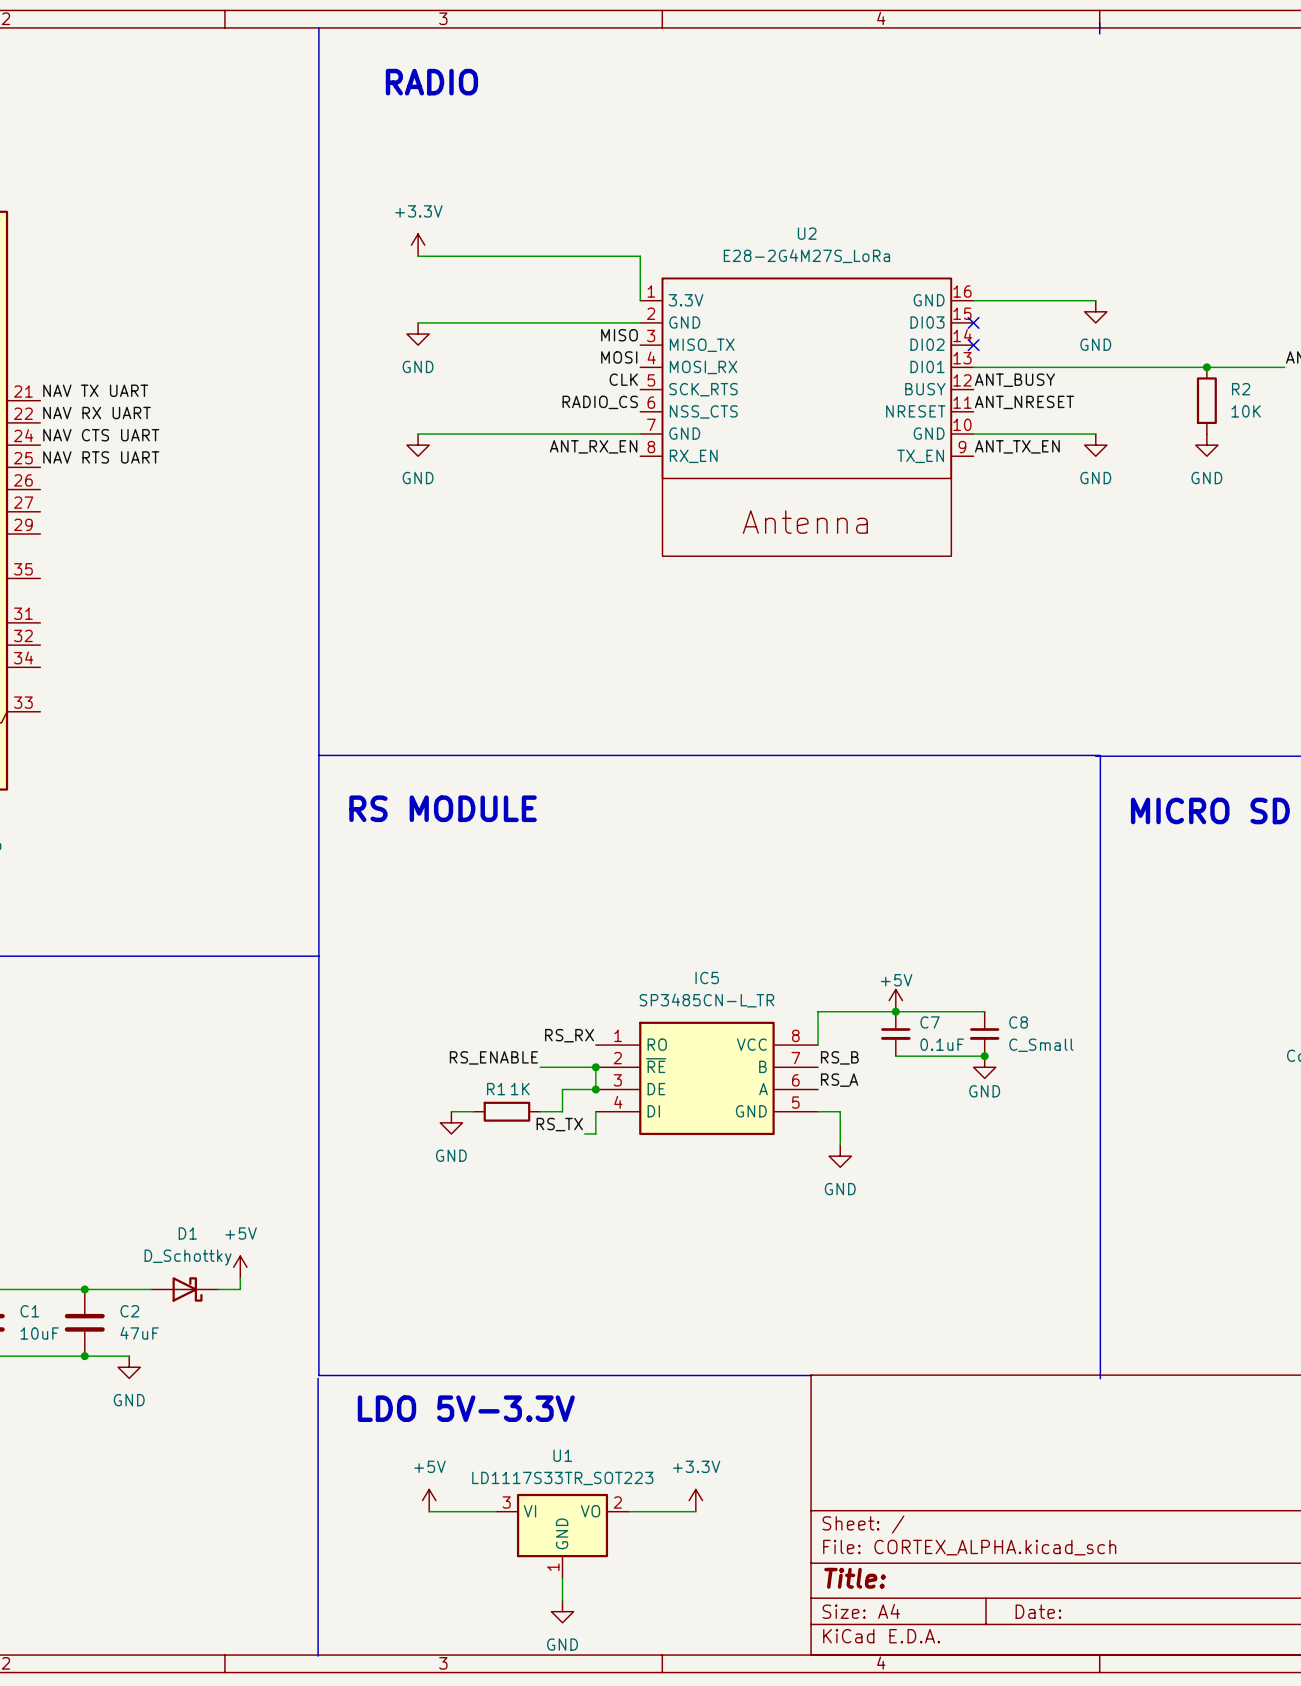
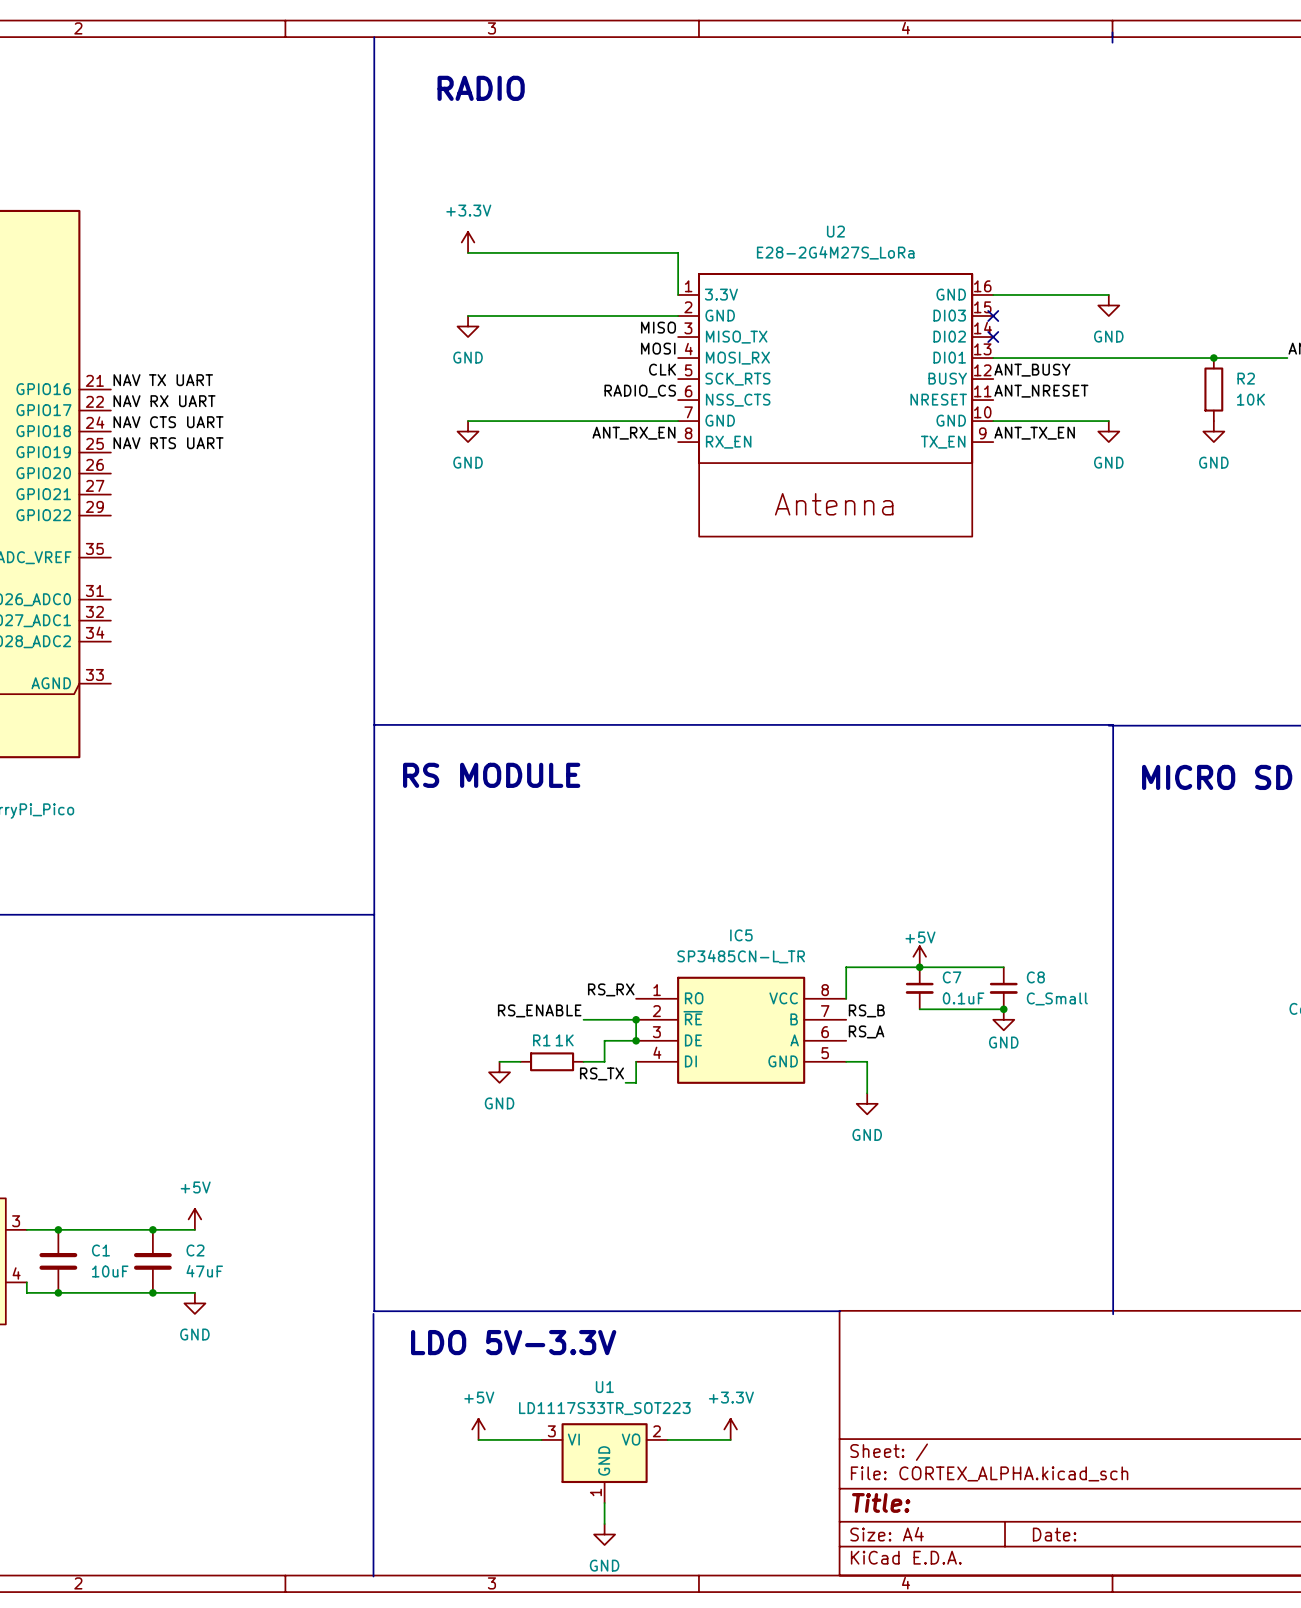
power symbol position: +5V (240, 1267) -> +5V (194, 1219)
wire: (240, 1278) (240, 1289) (218, 1289) -> none
wire: (129, 1289) (151, 1289) -> none
D1: D_Schottky (184, 1289) -> none

